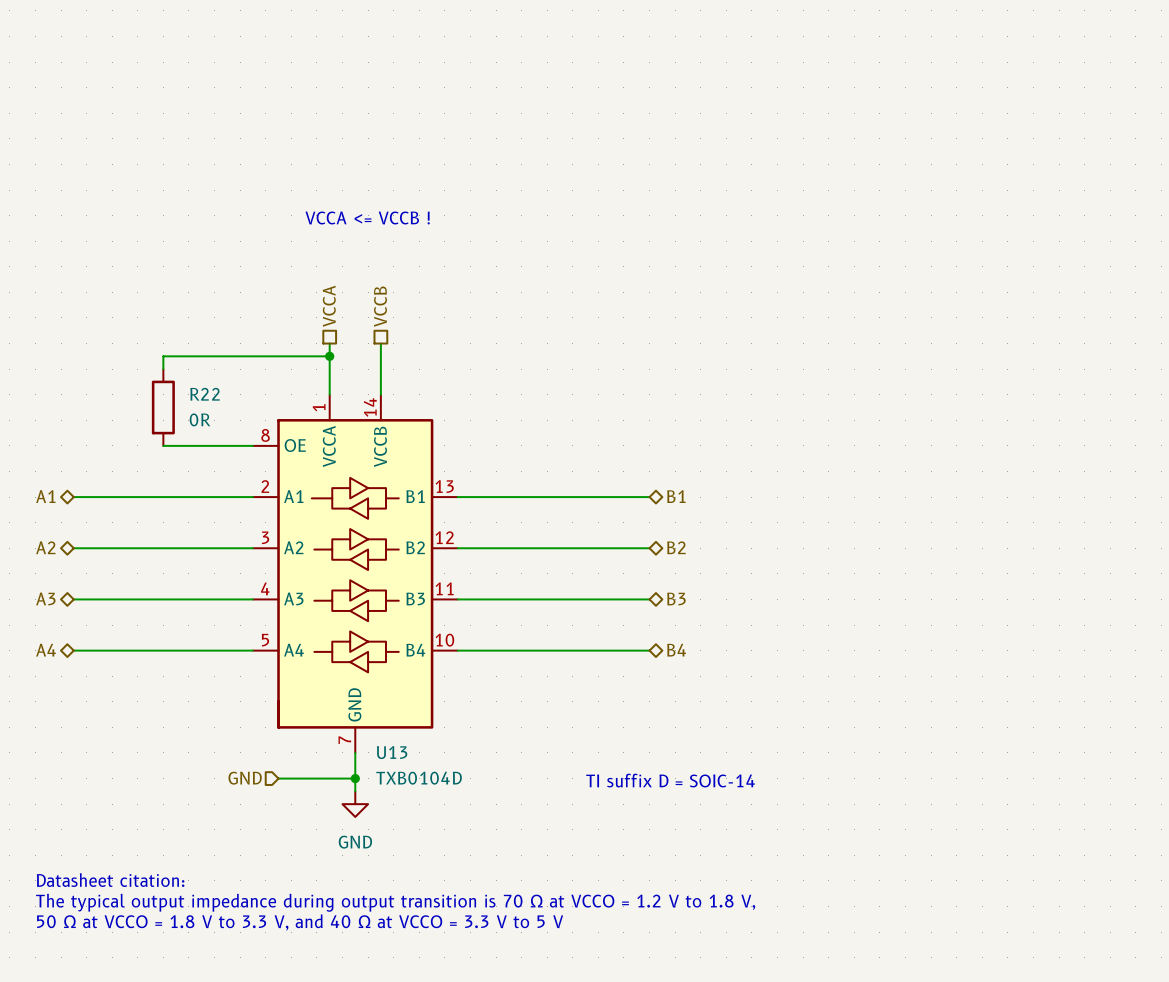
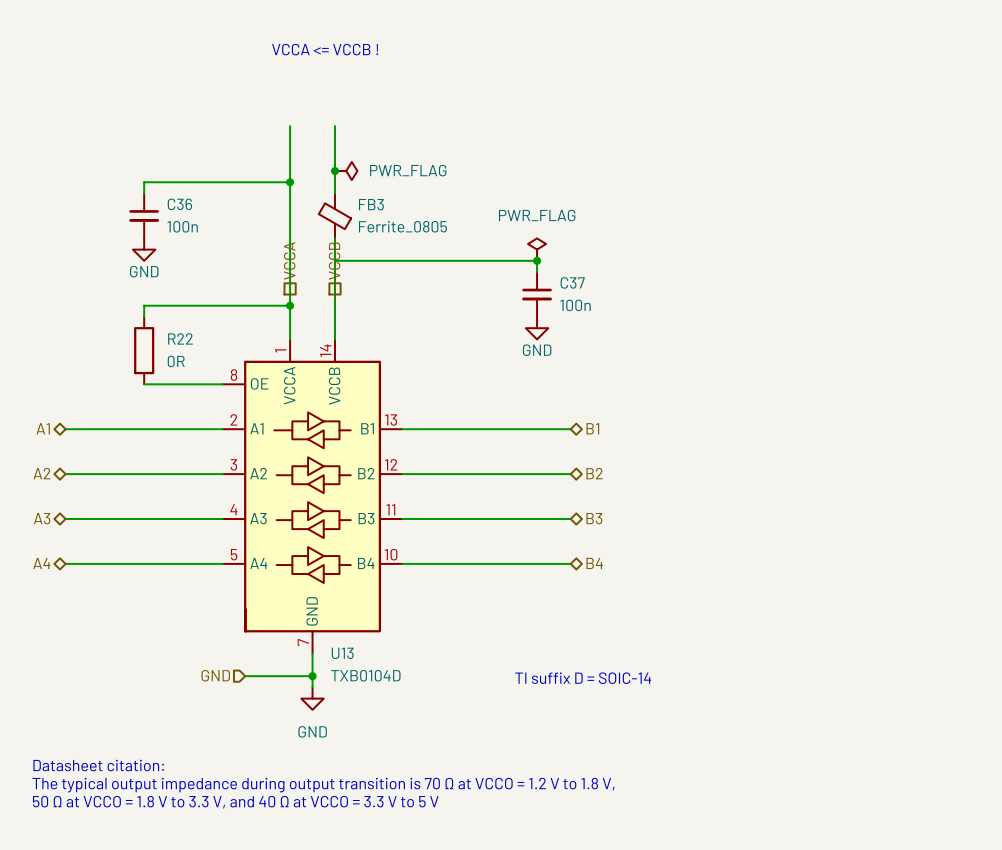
wire: none -> (290, 126) (290, 294)
wire: none -> (334, 126) (334, 193)
junction: none -> (334, 171)
power symbol: none -> PWR_FLAG (346, 171)
wire: none -> (290, 182) (144, 182) (144, 193)
junction: none -> (290, 182)
text position: VCCA <= VCCB ! (367, 217) -> VCCA <= VCCB ! (325, 49)
C36: none -> 100n (144, 215)
FB3: none -> Ferrite_0805 (334, 215)
wire: none -> (334, 238) (334, 294)
power symbol: none -> GND (144, 249)
power symbol: none -> PWR_FLAG (537, 249)
wire: none -> (334, 260) (537, 260) (537, 272)
junction: none -> (537, 260)
C37: none -> 100n (537, 294)
power symbol: none -> GND (537, 328)

